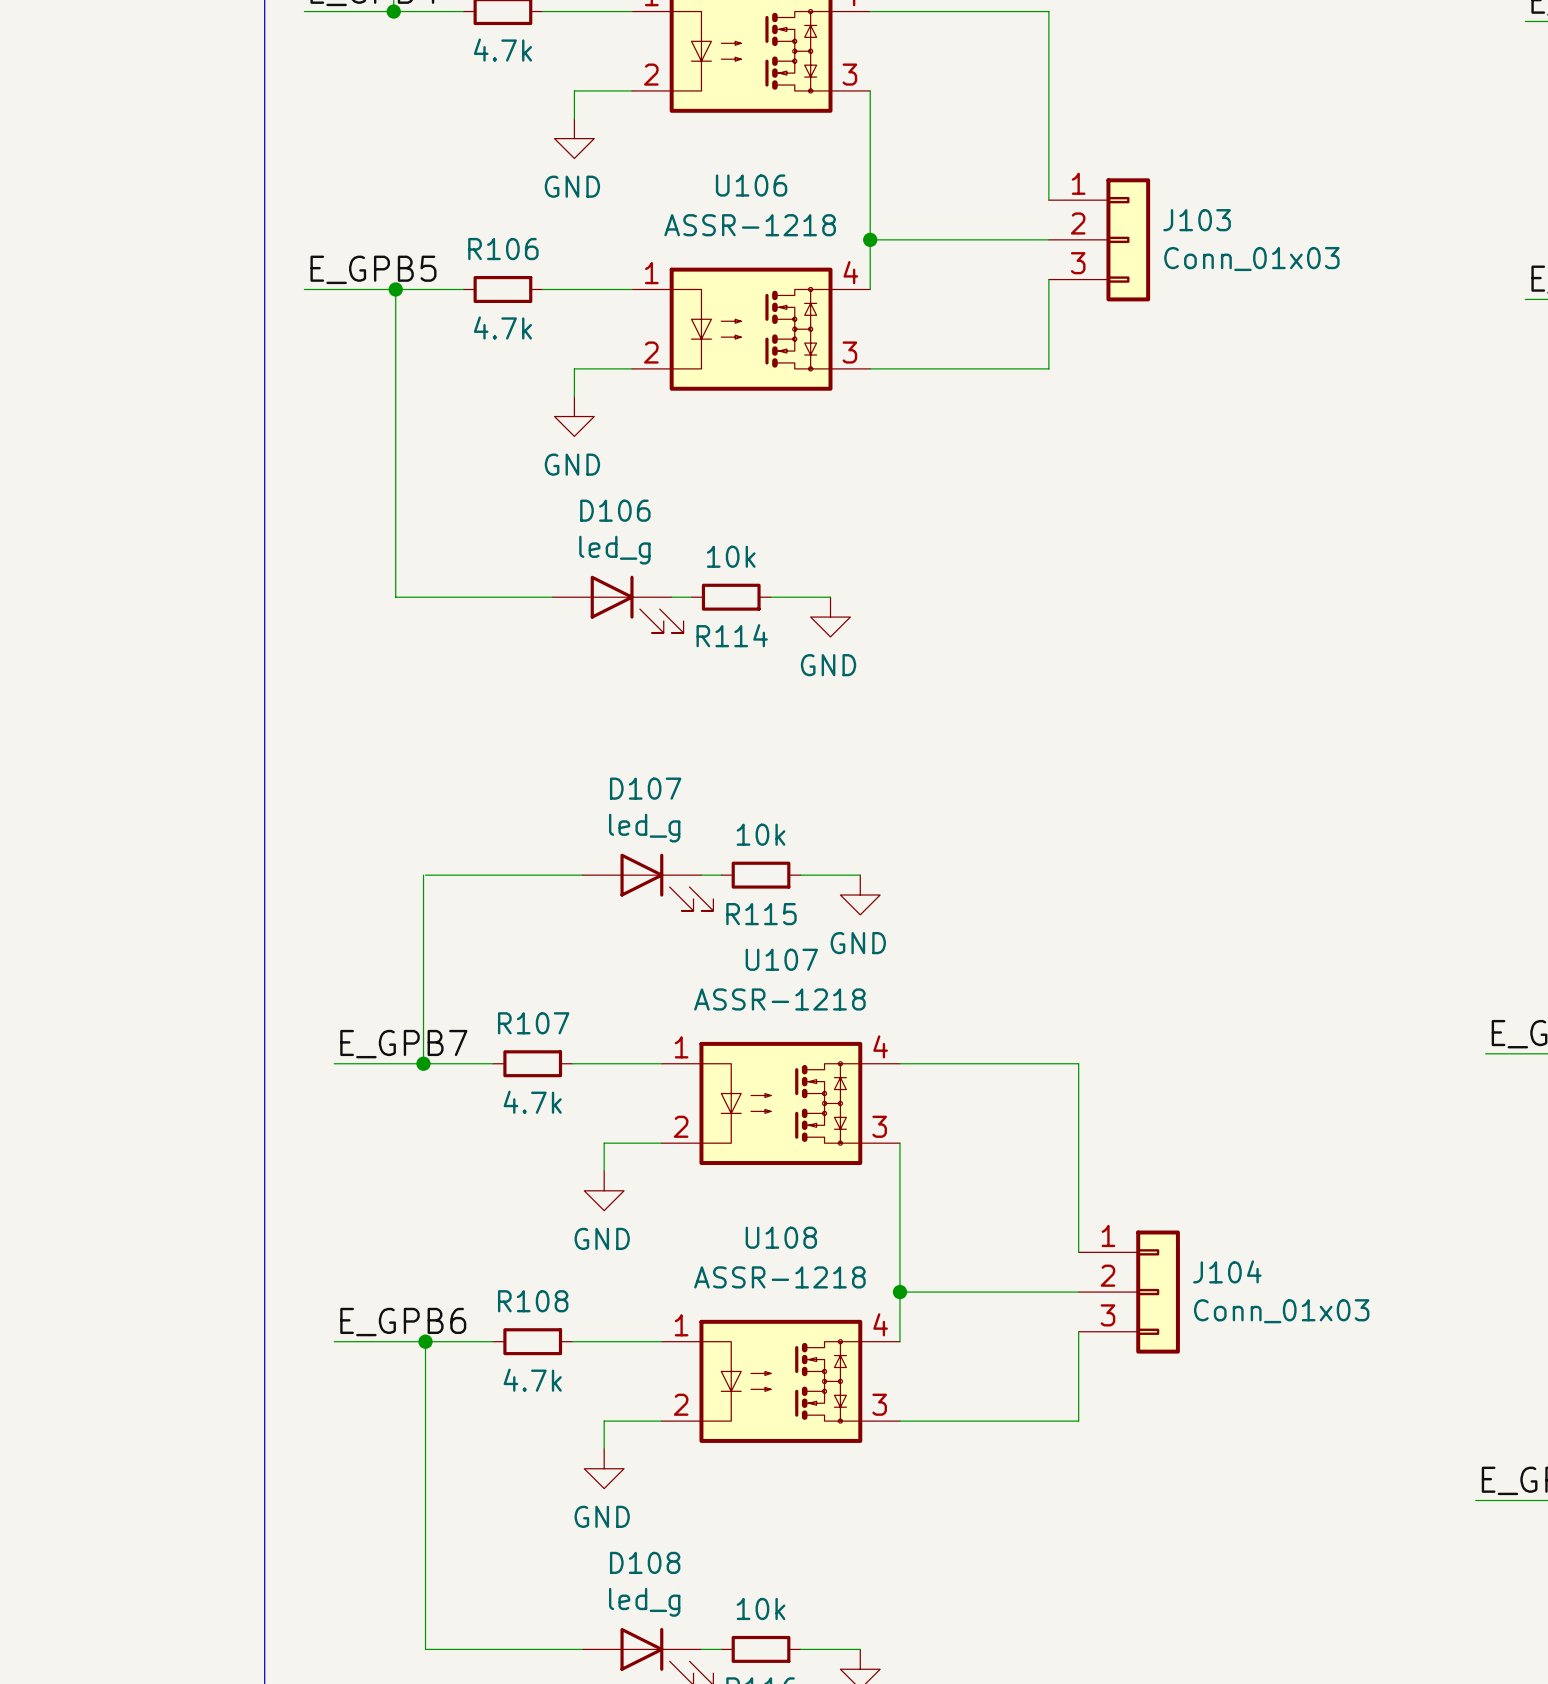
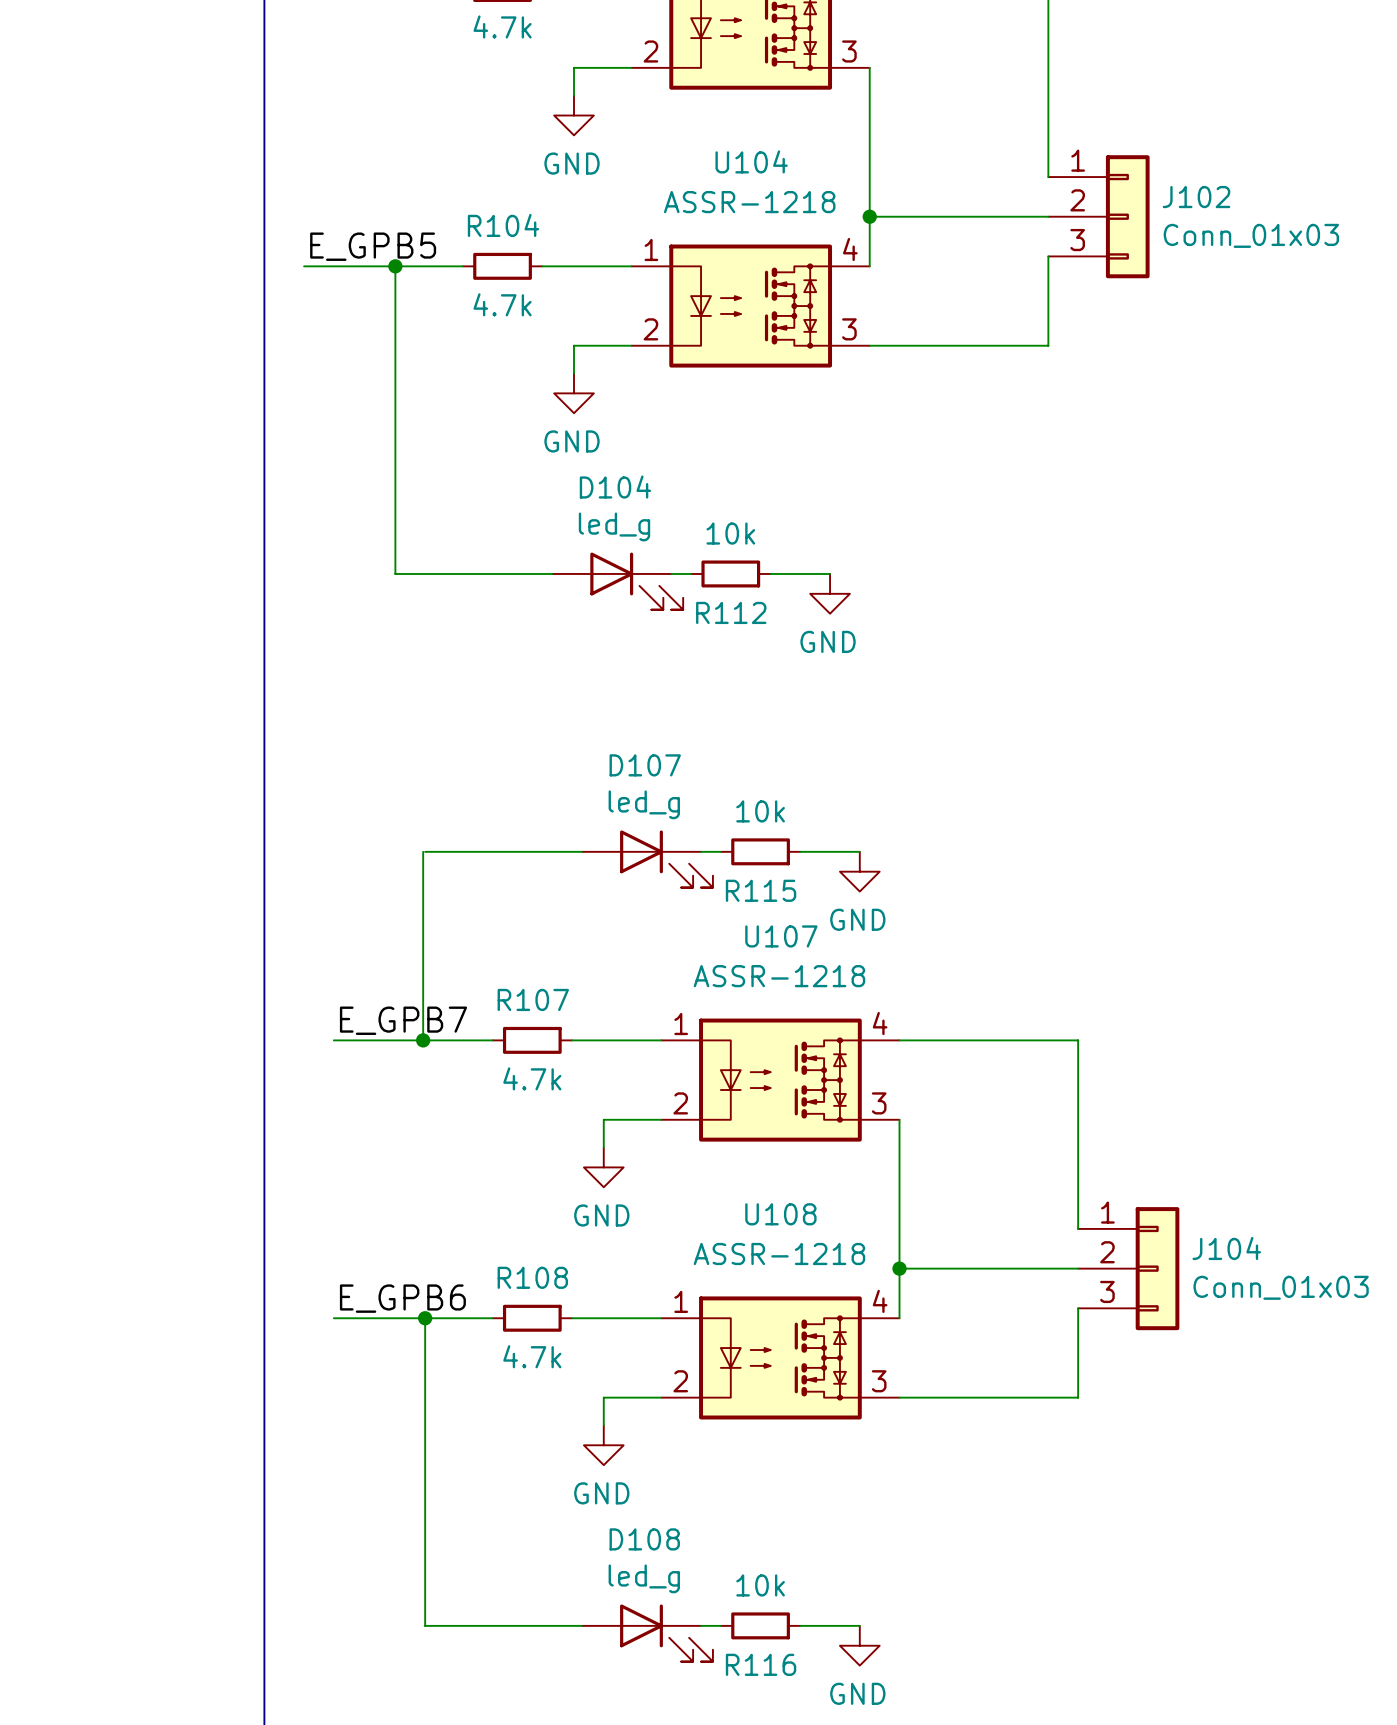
U106 name: U106 (751, 185) -> U104 (751, 161)
J103 name: J103 (1197, 220) -> J102 (1196, 197)
R106 name: R106 (503, 249) -> R104 (503, 225)
D106 name: D106 (615, 510) -> D104 (615, 487)
R114 name: R114 (732, 635) -> R112 (731, 612)

